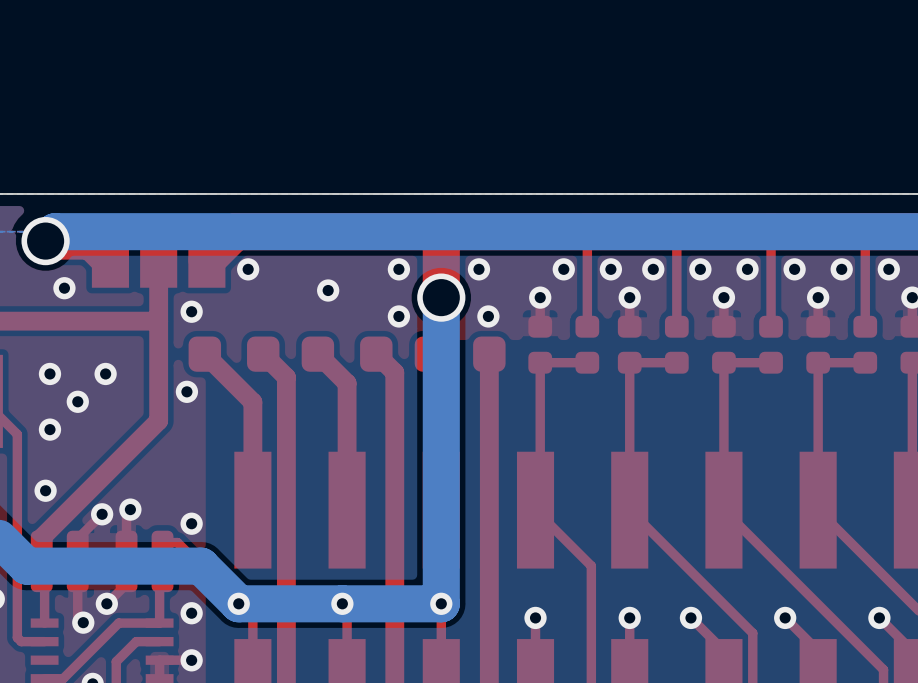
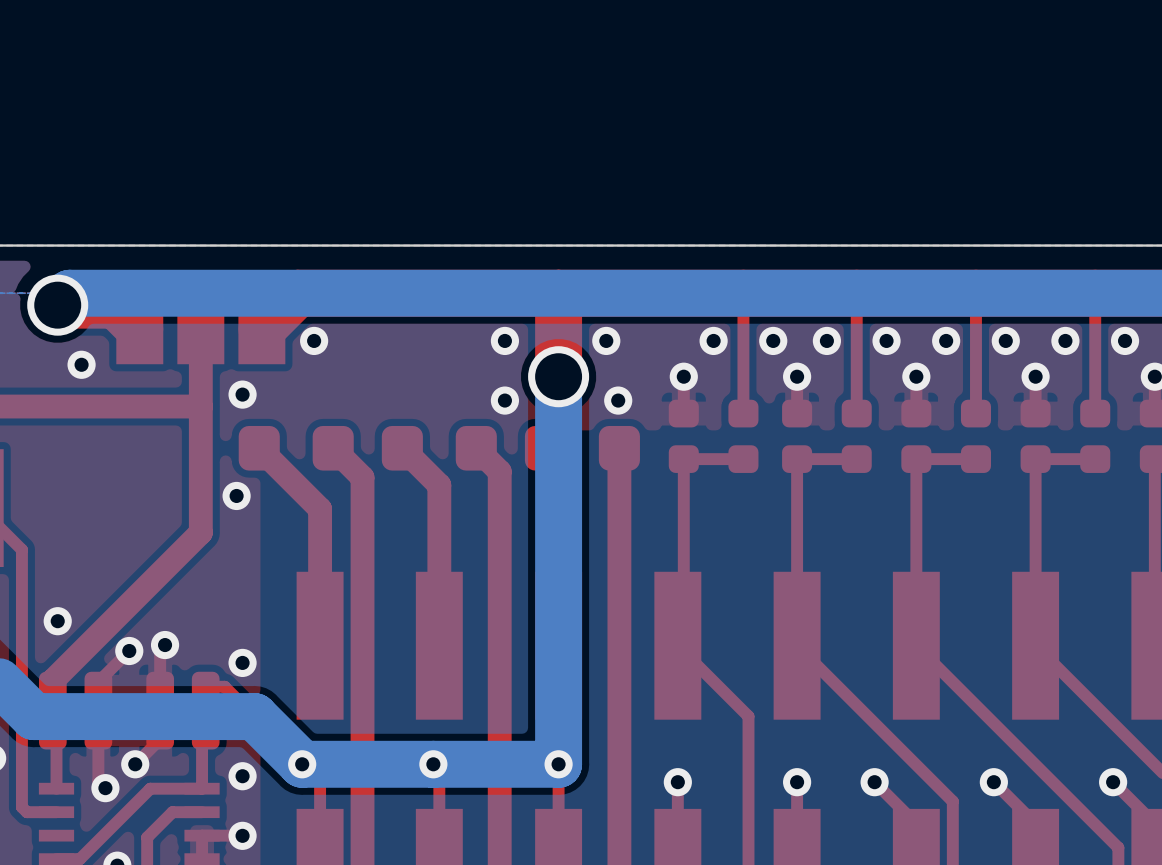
via: (328, 290) -> none
via: (49, 373) -> none
via: (105, 373) -> none
via: (77, 401) -> none
via: (49, 429) -> none

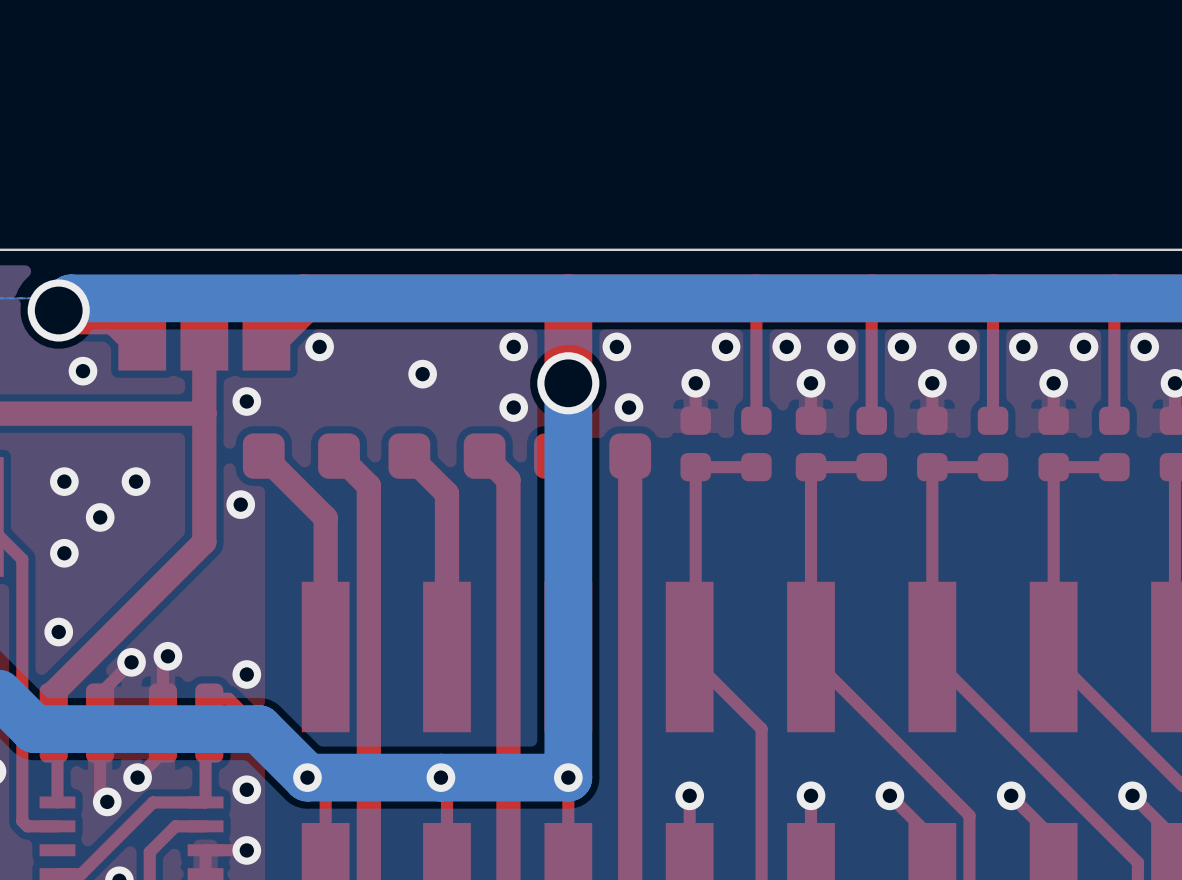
via: none -> (422, 374)
via: none -> (64, 481)
via: none -> (136, 481)
via: none -> (100, 517)
via: none -> (64, 553)

